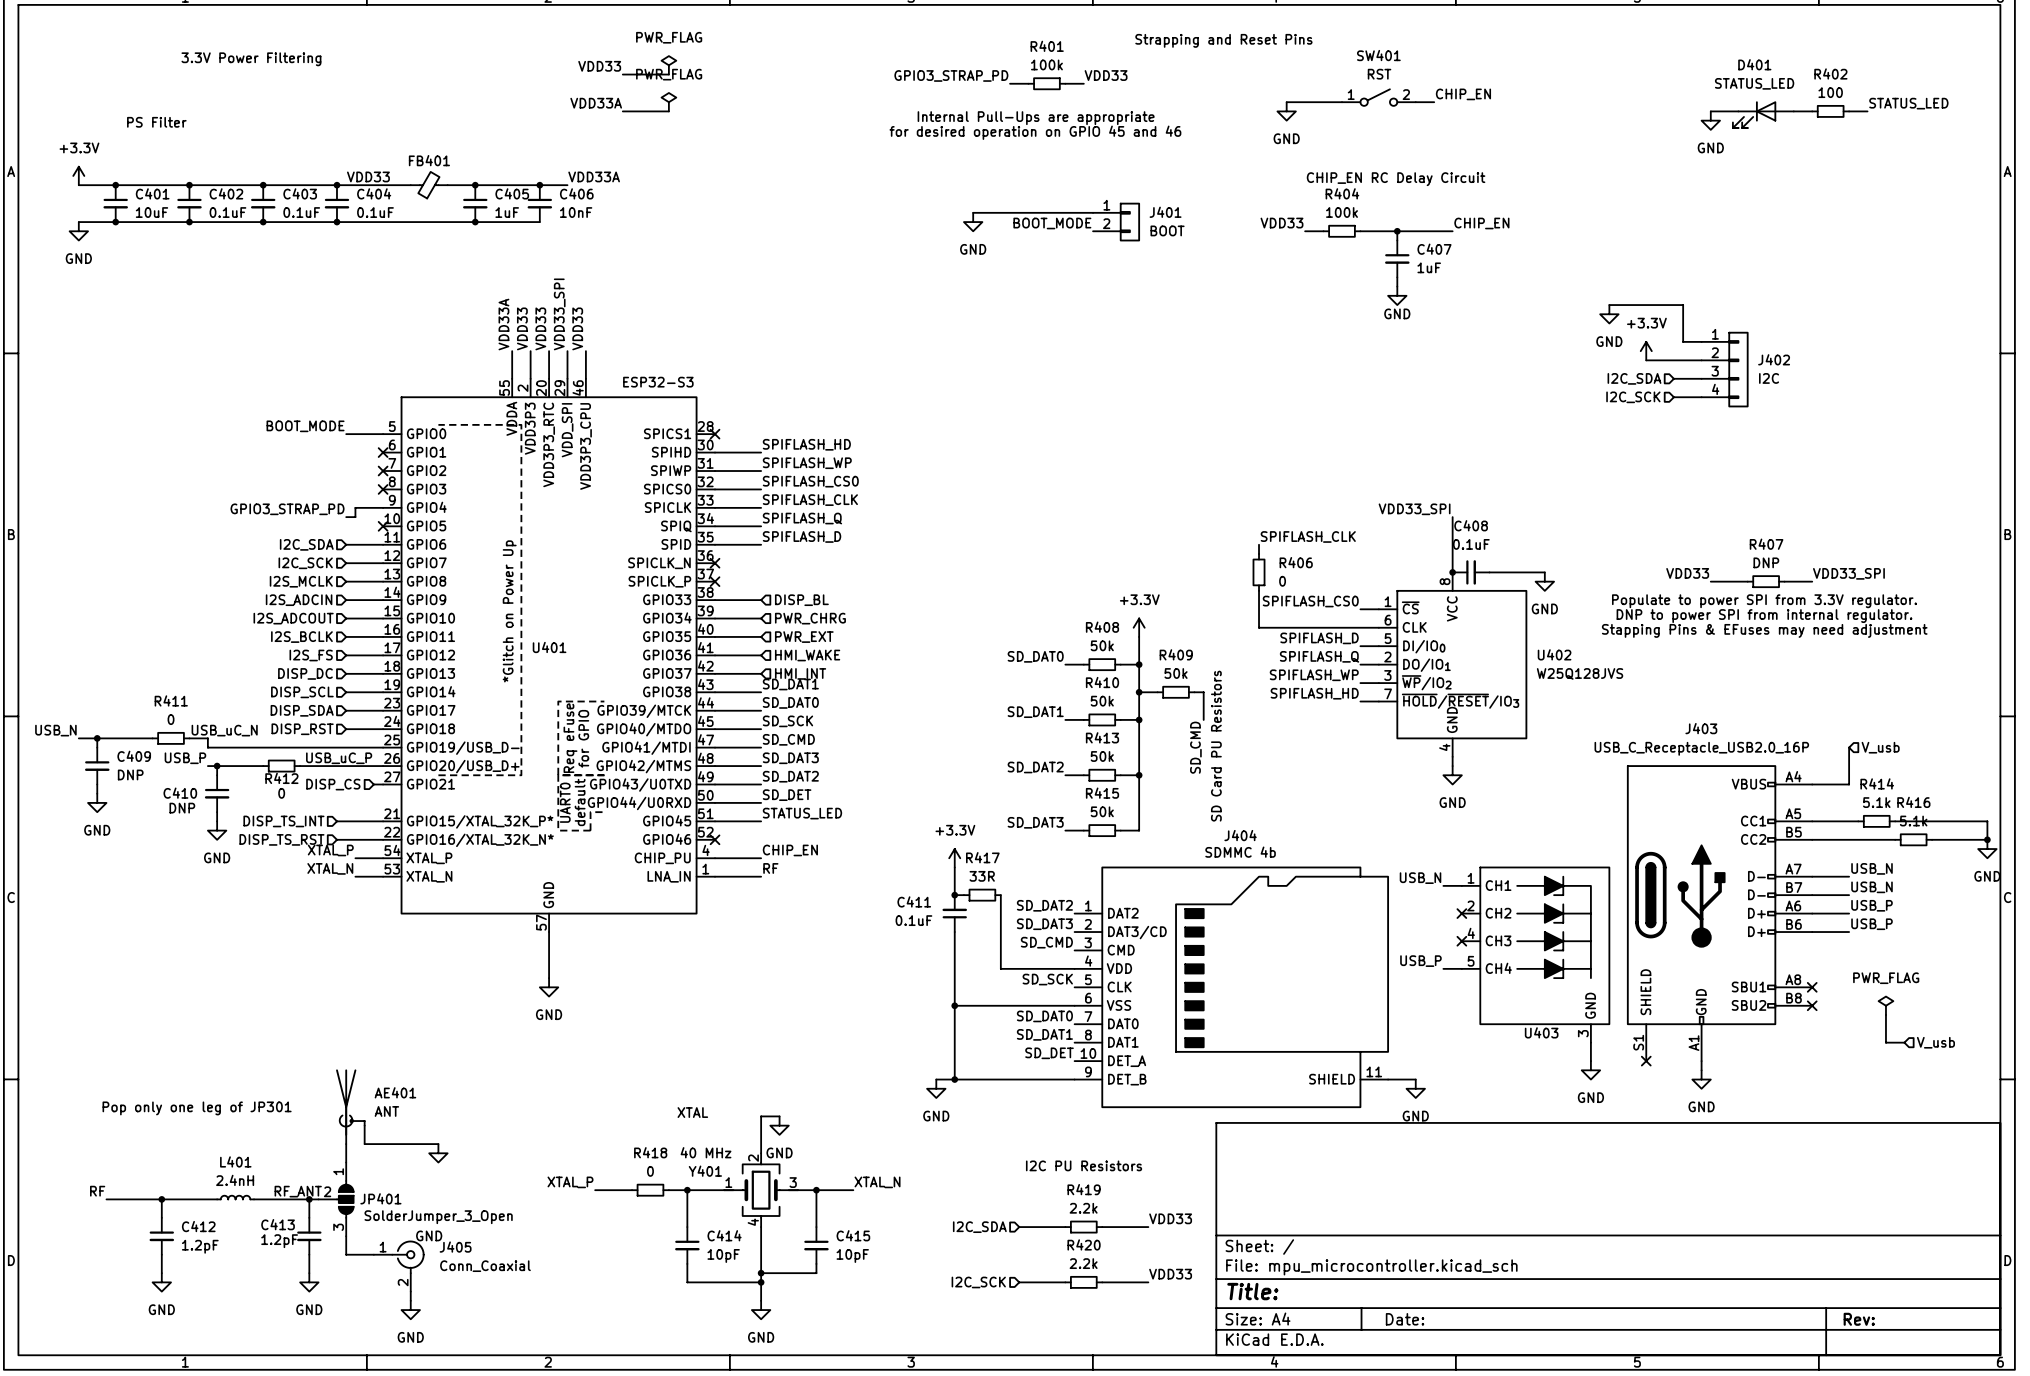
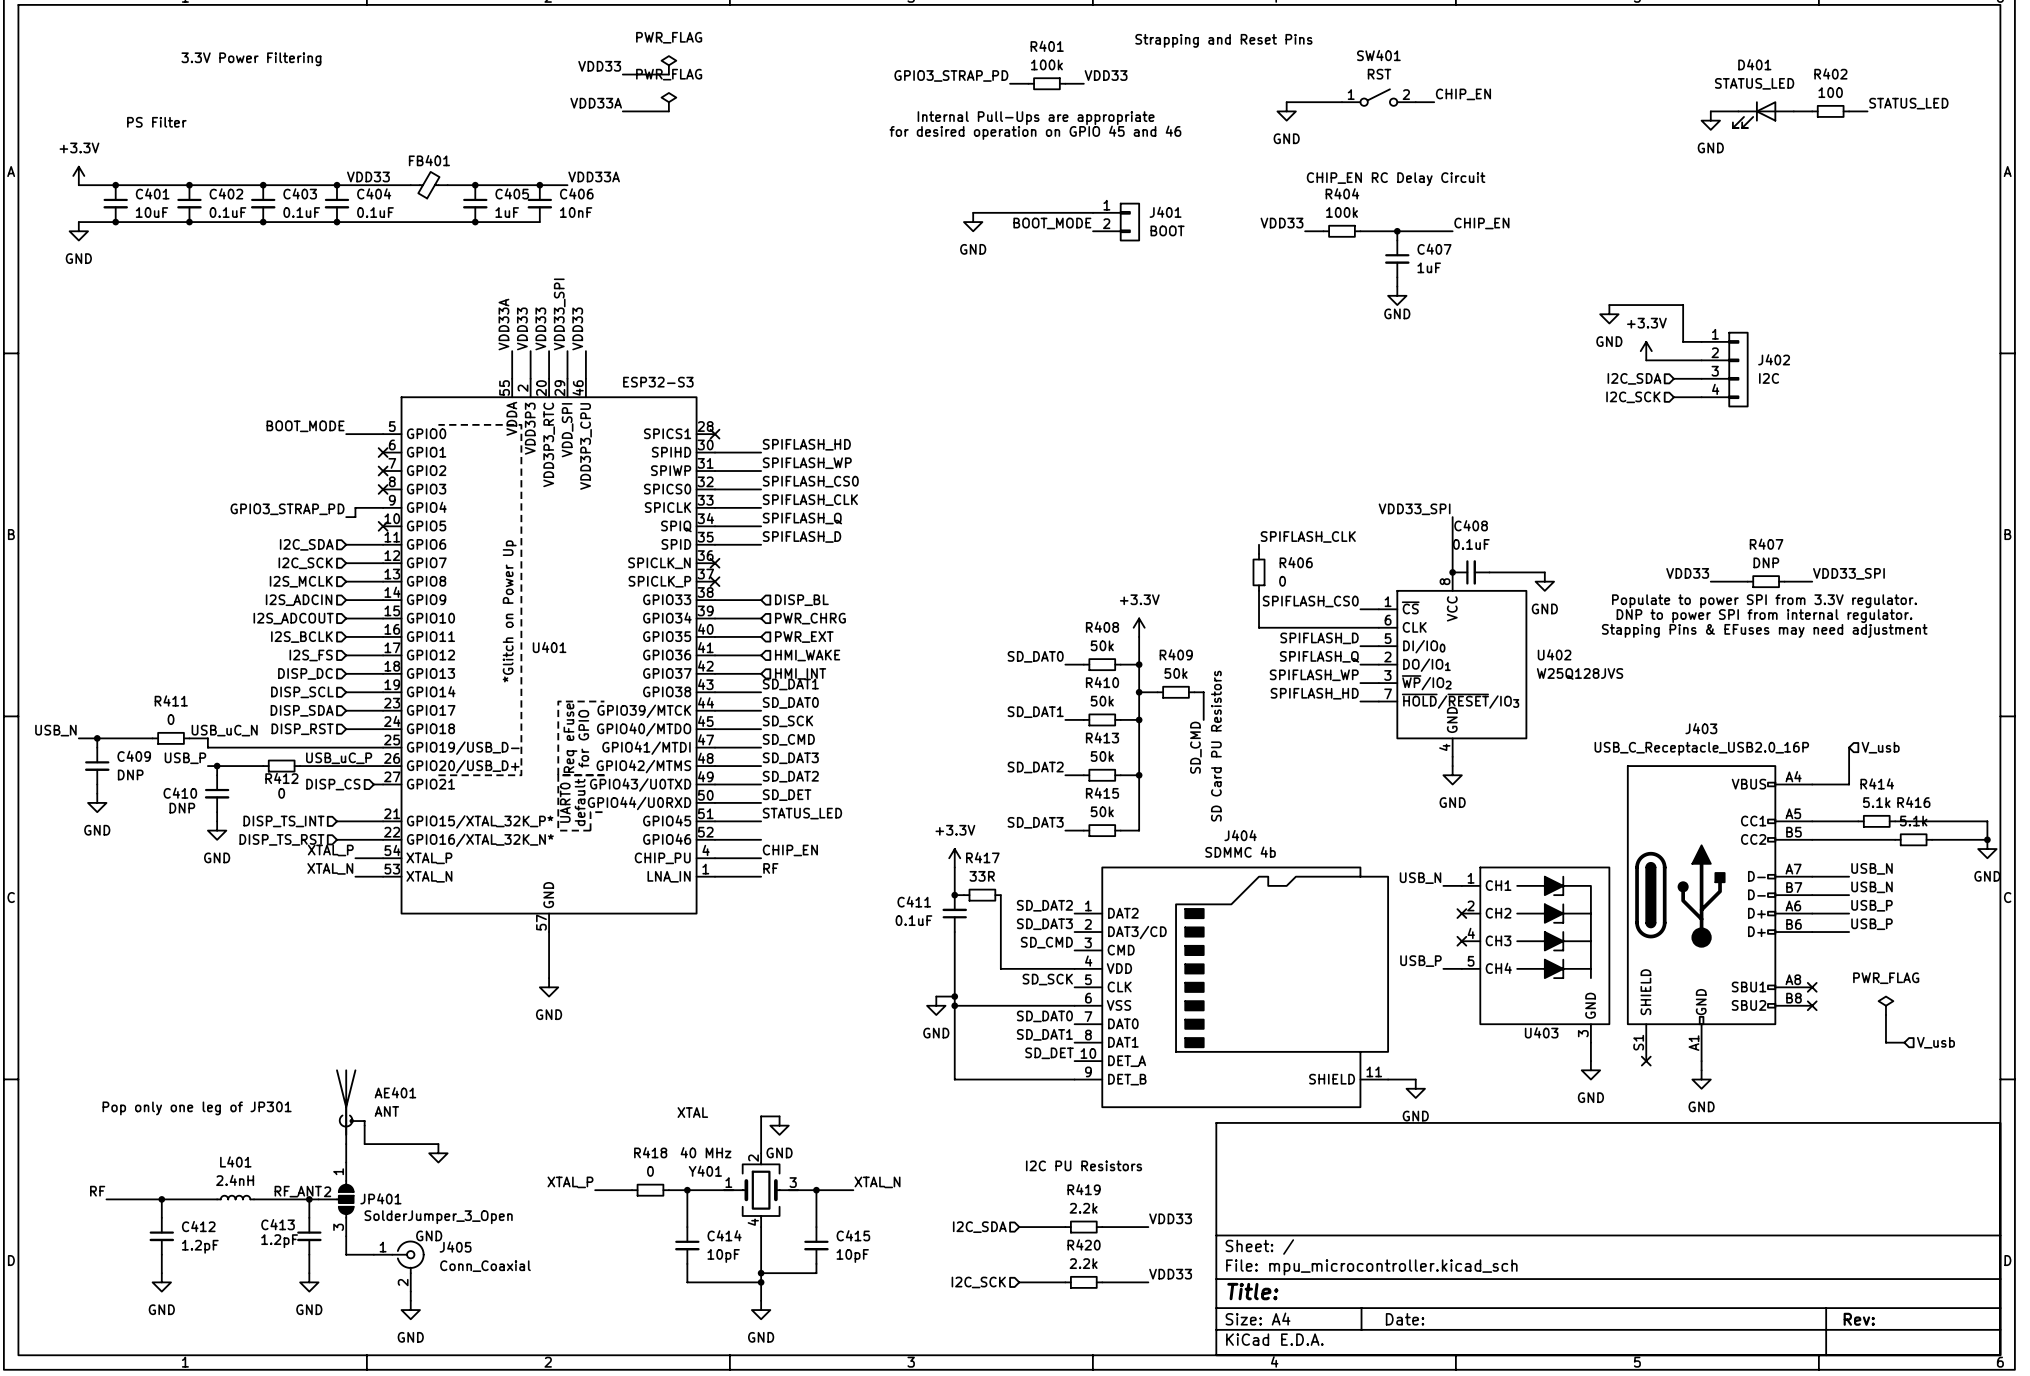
wire: none -> (715, 839) (761, 839)
no-connect mark: (715, 839) -> none
junction: none -> (954, 996)
wire: (936, 1079) (954, 1079) -> (936, 996) (954, 996)
junction: (954, 1079) -> none
power symbol position: GND (936, 1088) -> GND (936, 1005)

